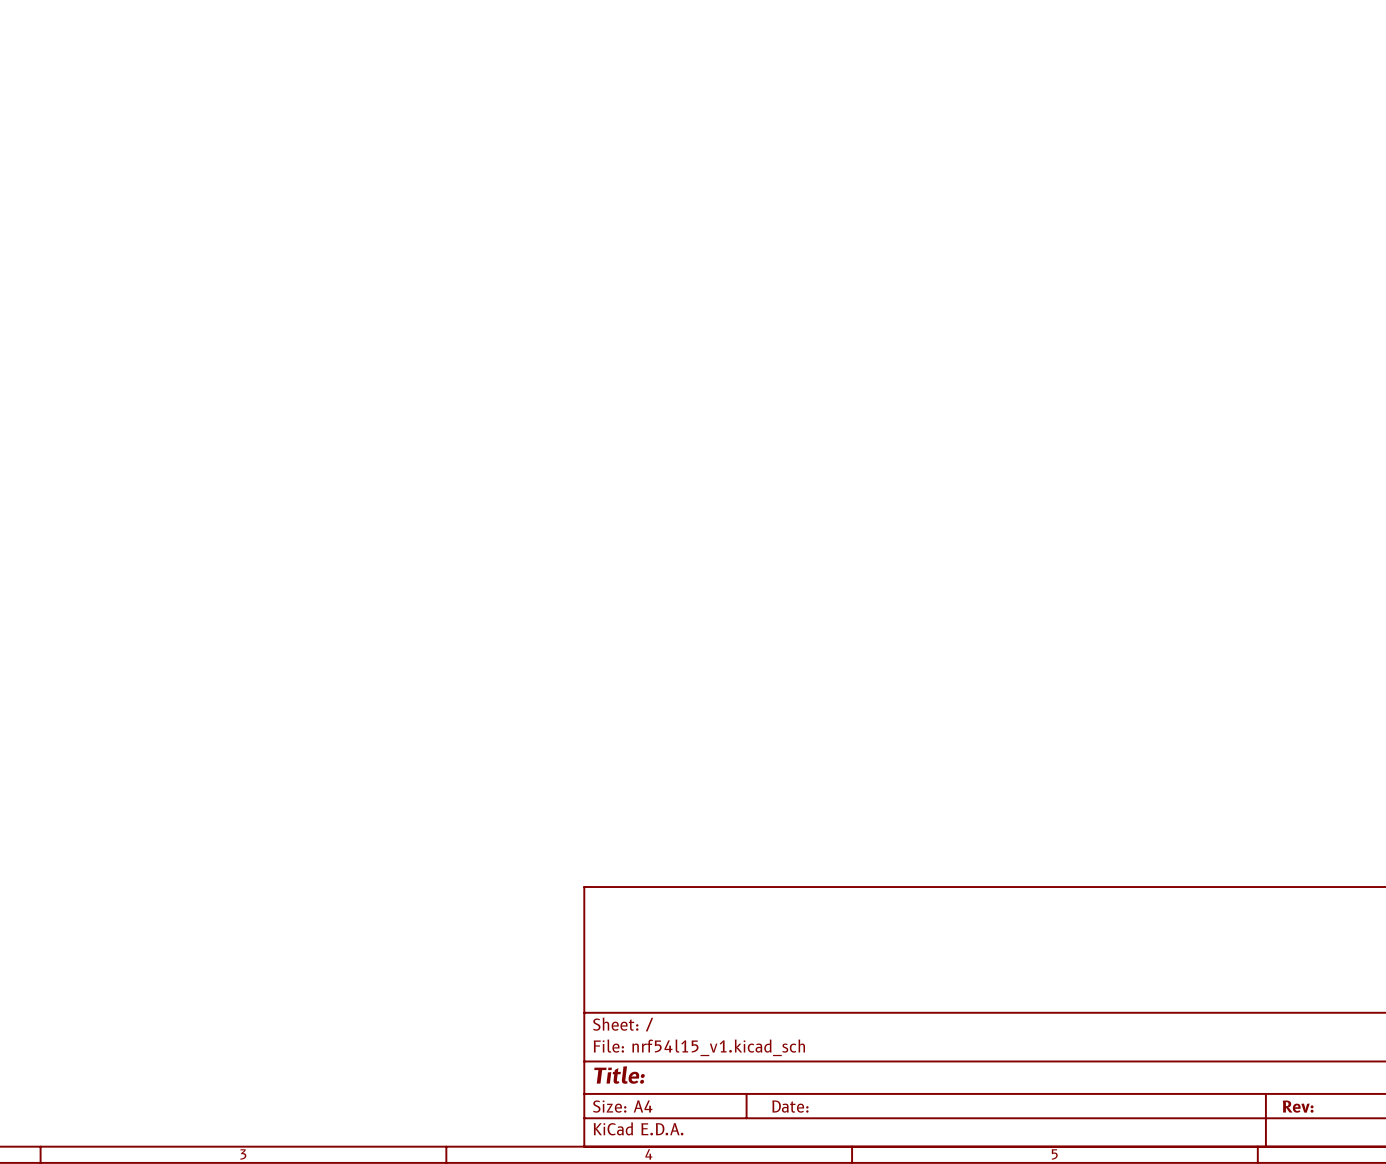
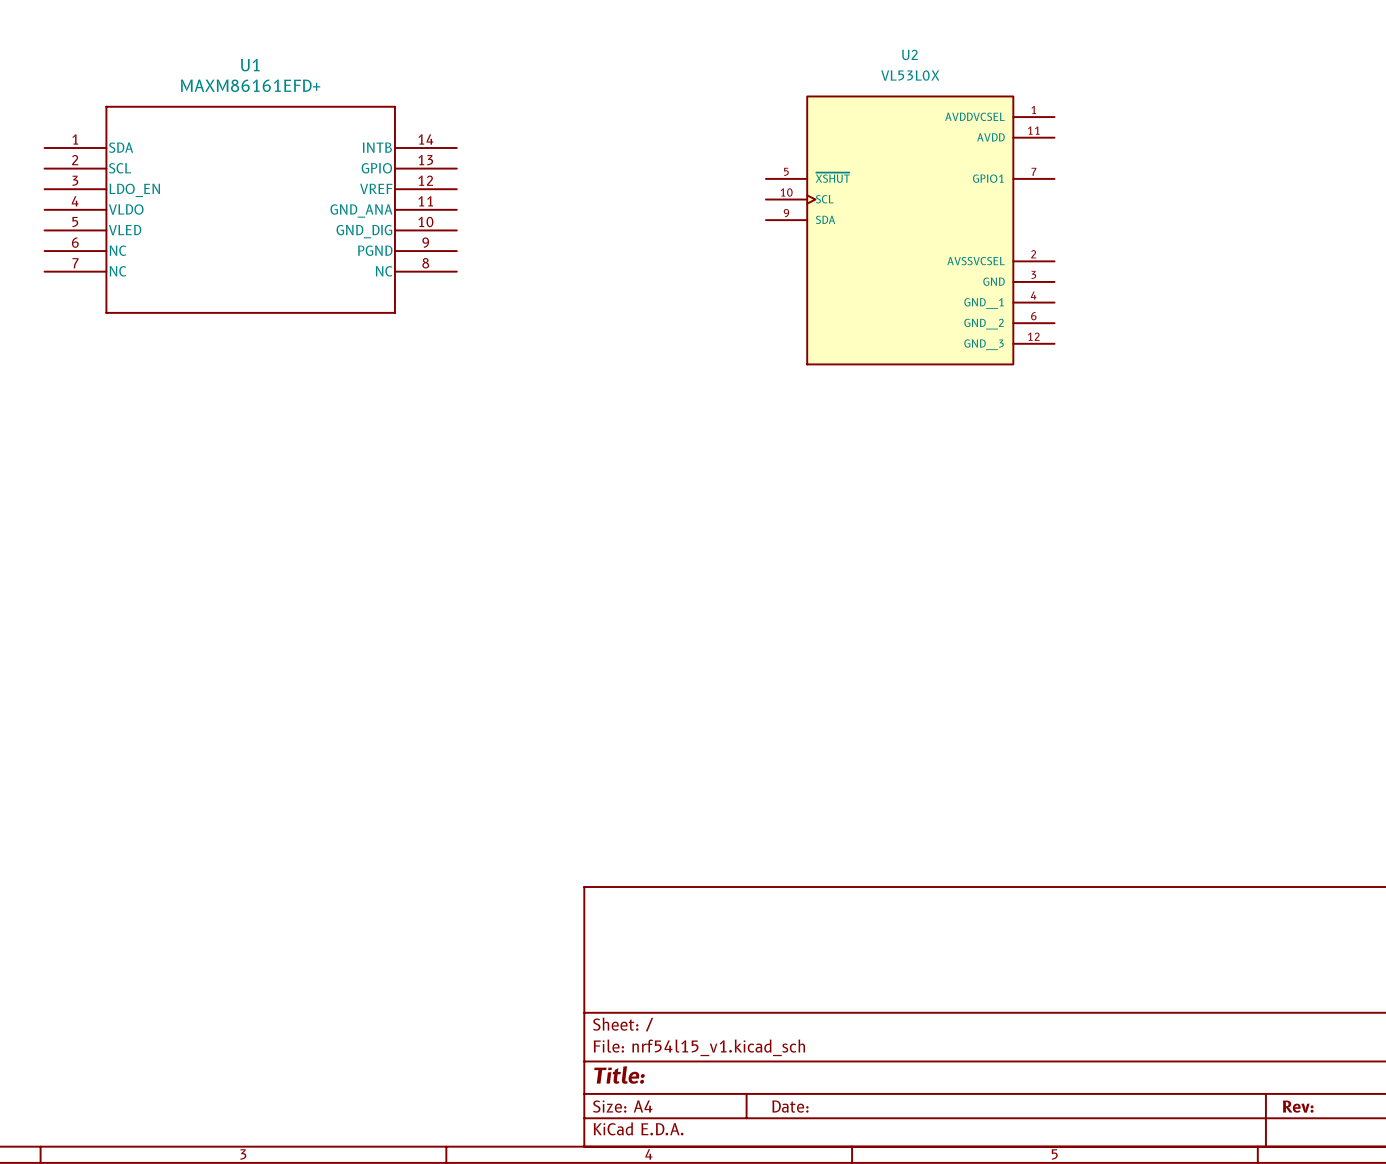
U1: none -> MAXM86161EFD+ (250, 209)
U2: none -> VL53L0X (910, 230)

